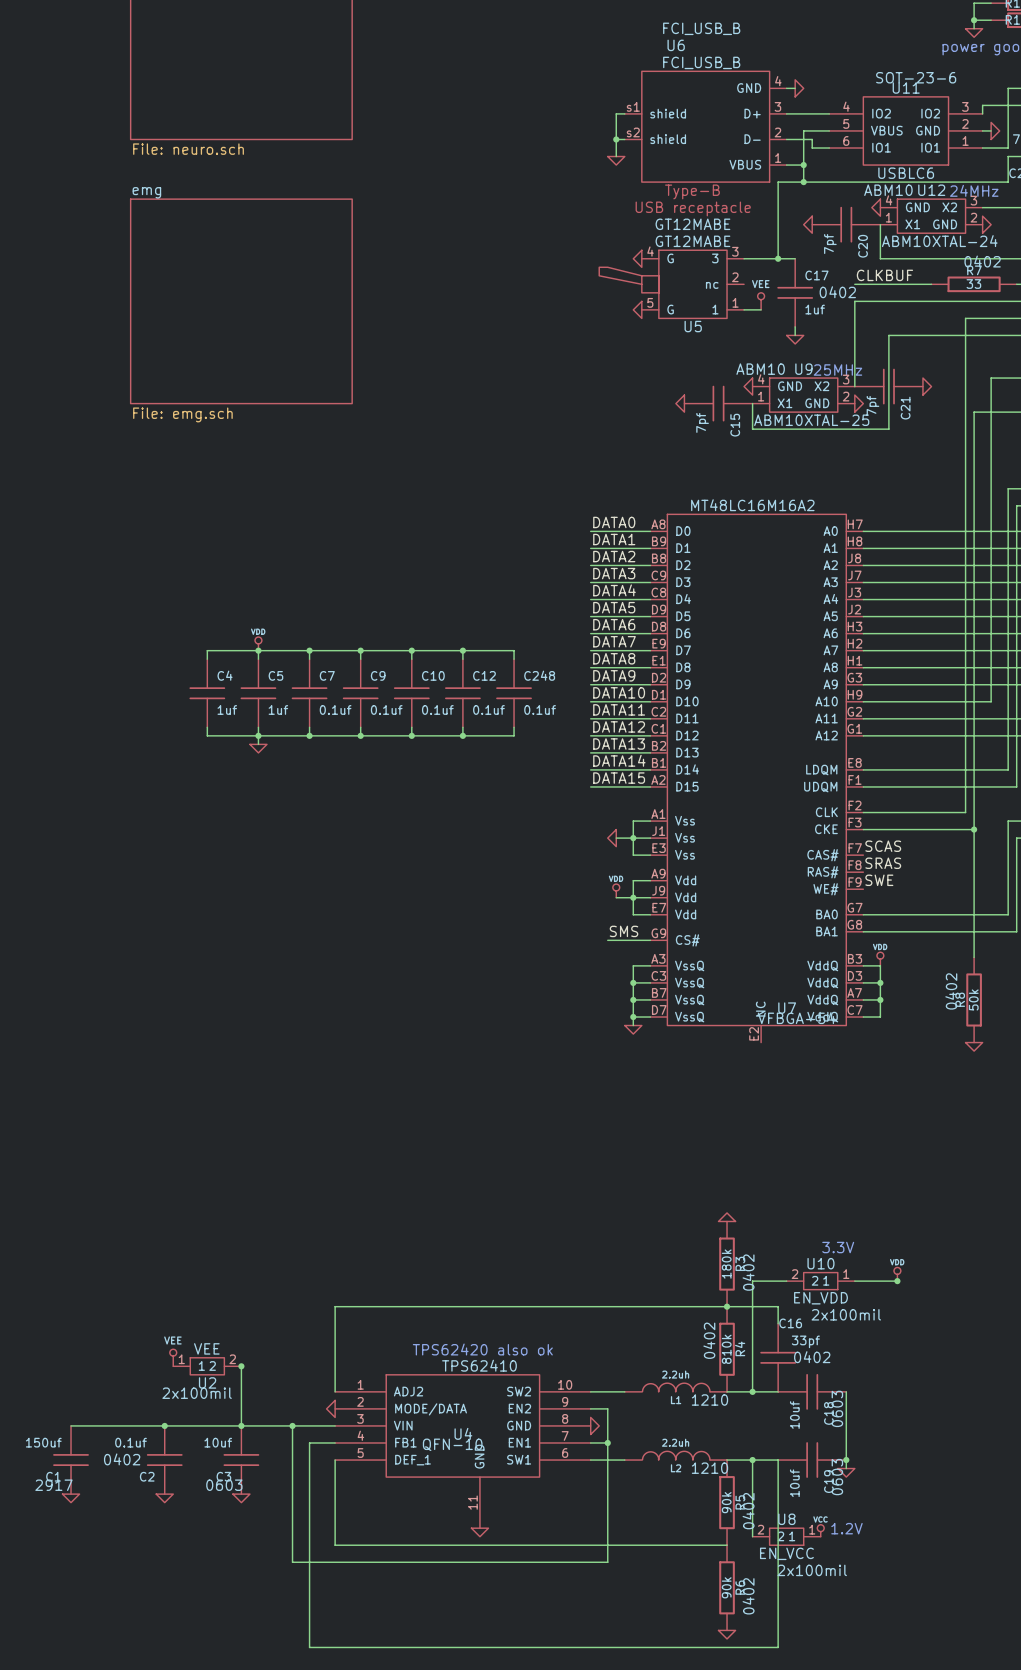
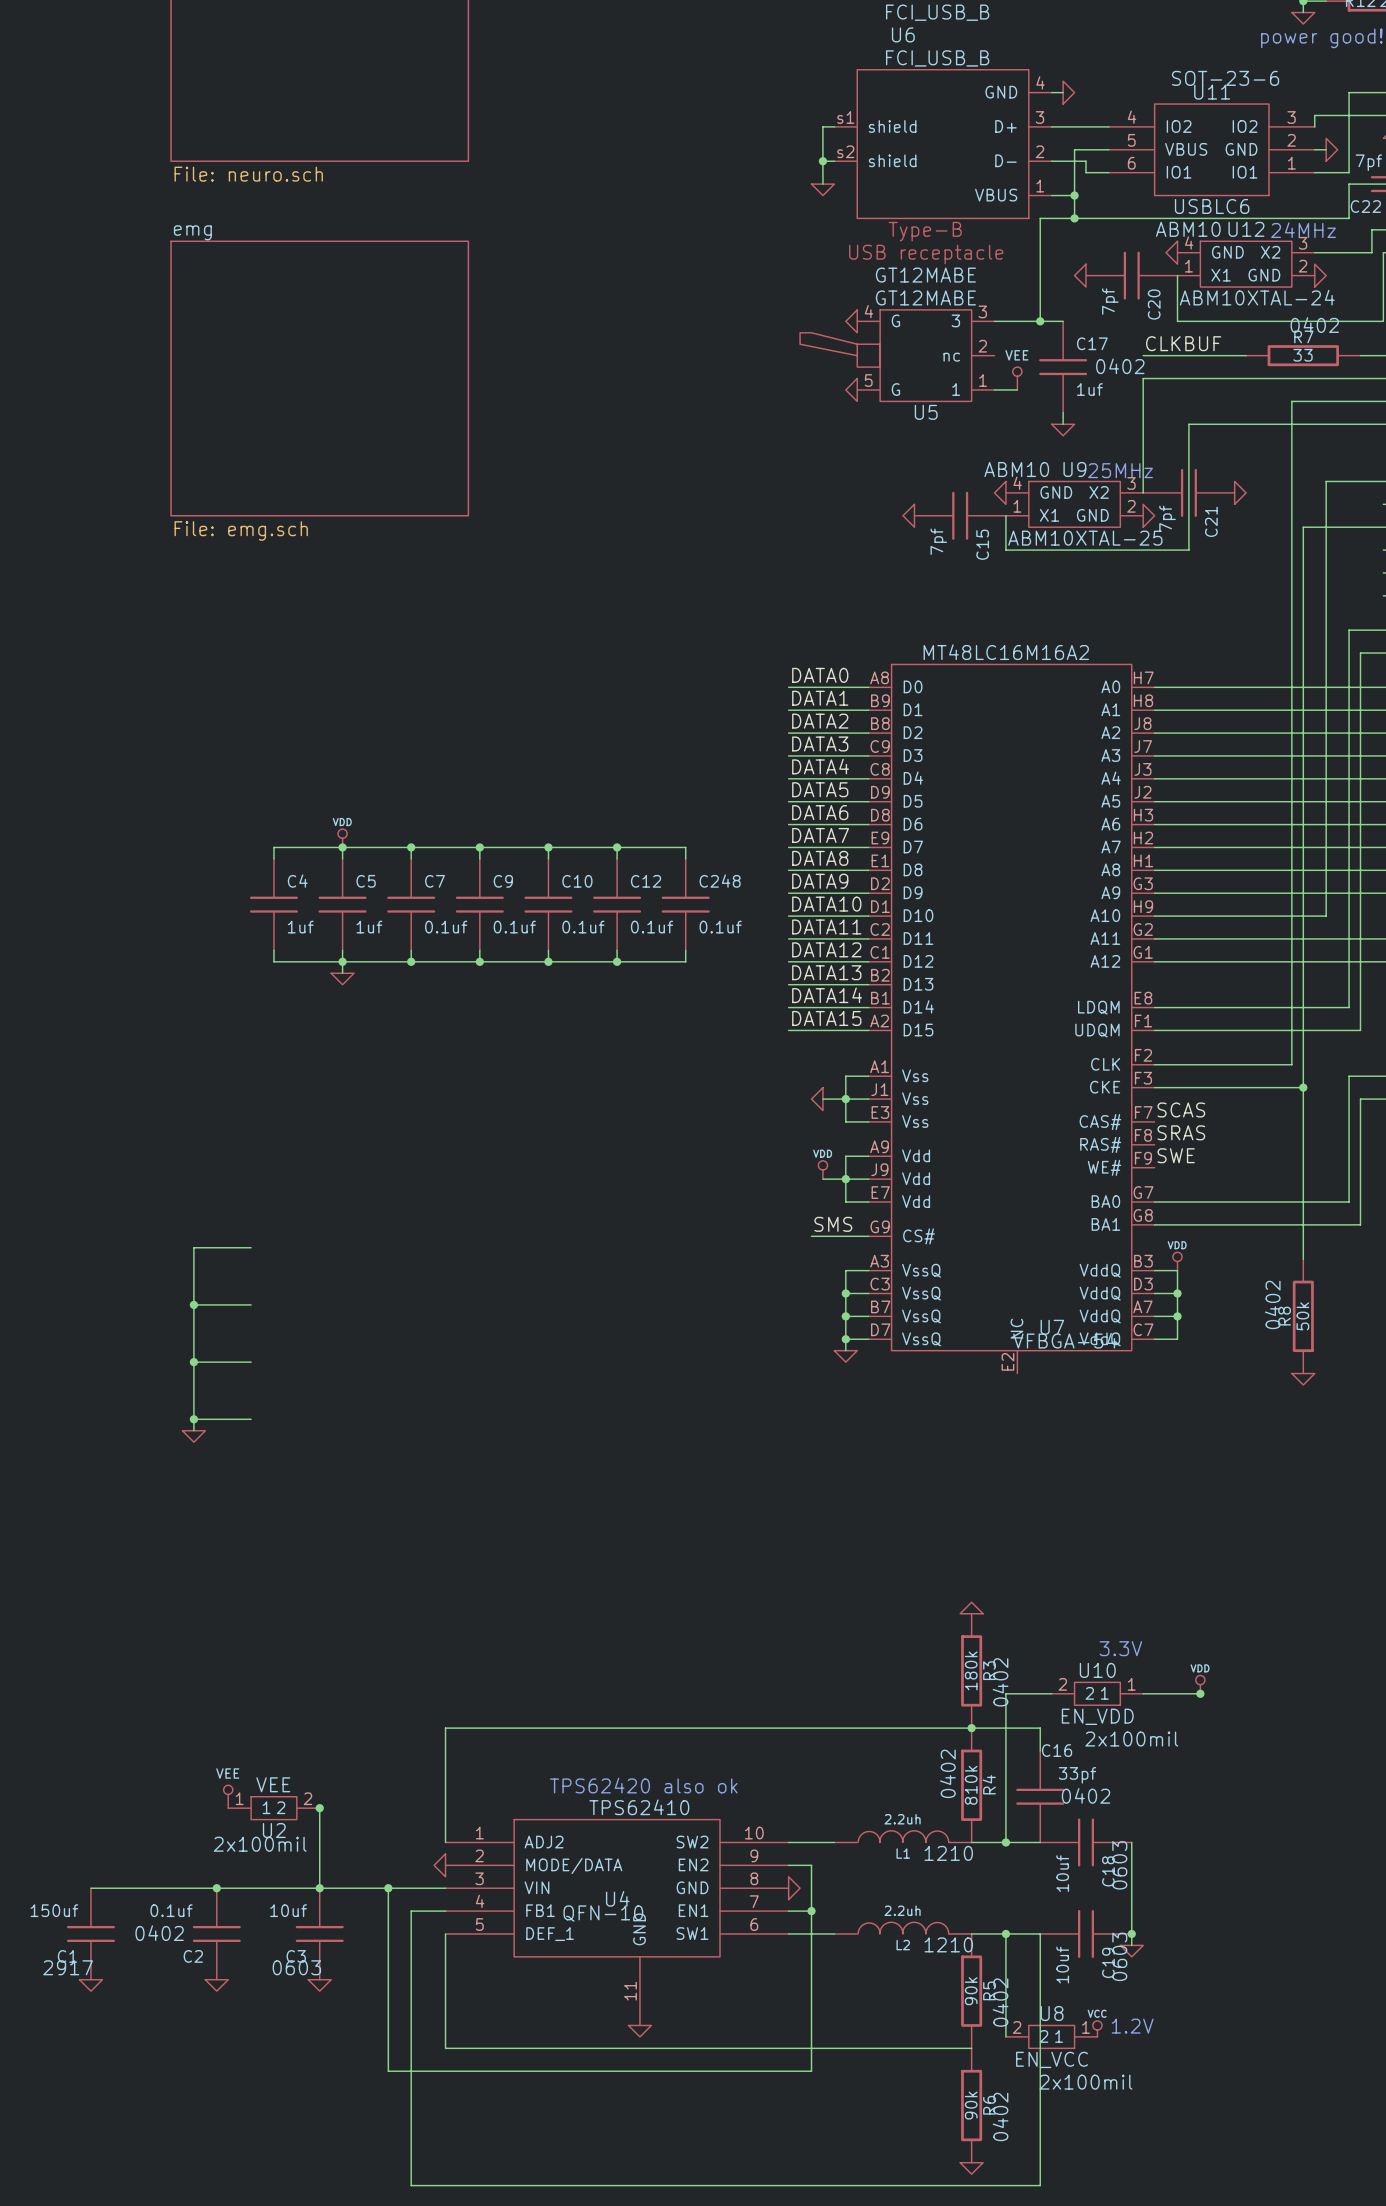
wire: none -> (251, 1247) (193, 1247) (193, 1430)
wire: none -> (193, 1304) (251, 1304)
junction: none -> (193, 1304)
wire: none -> (193, 1362) (251, 1362)
junction: none -> (193, 1362)
wire: none -> (193, 1419) (251, 1419)
junction: none -> (193, 1419)
power symbol: none -> (193, 1436)

